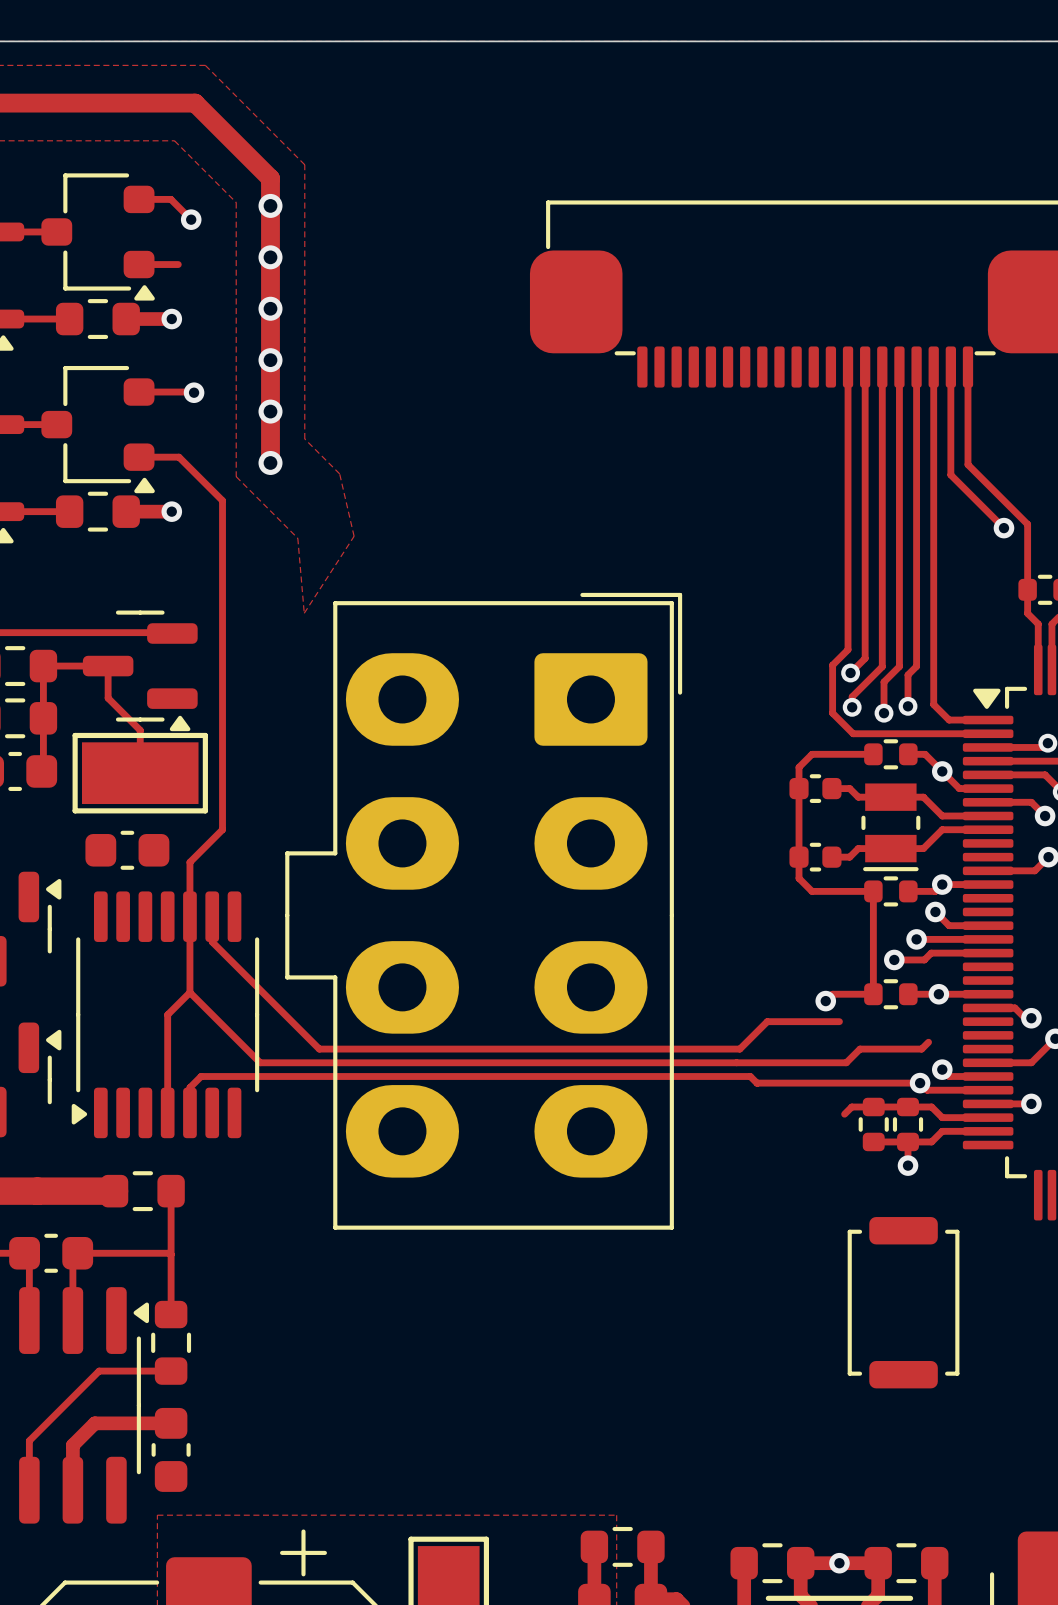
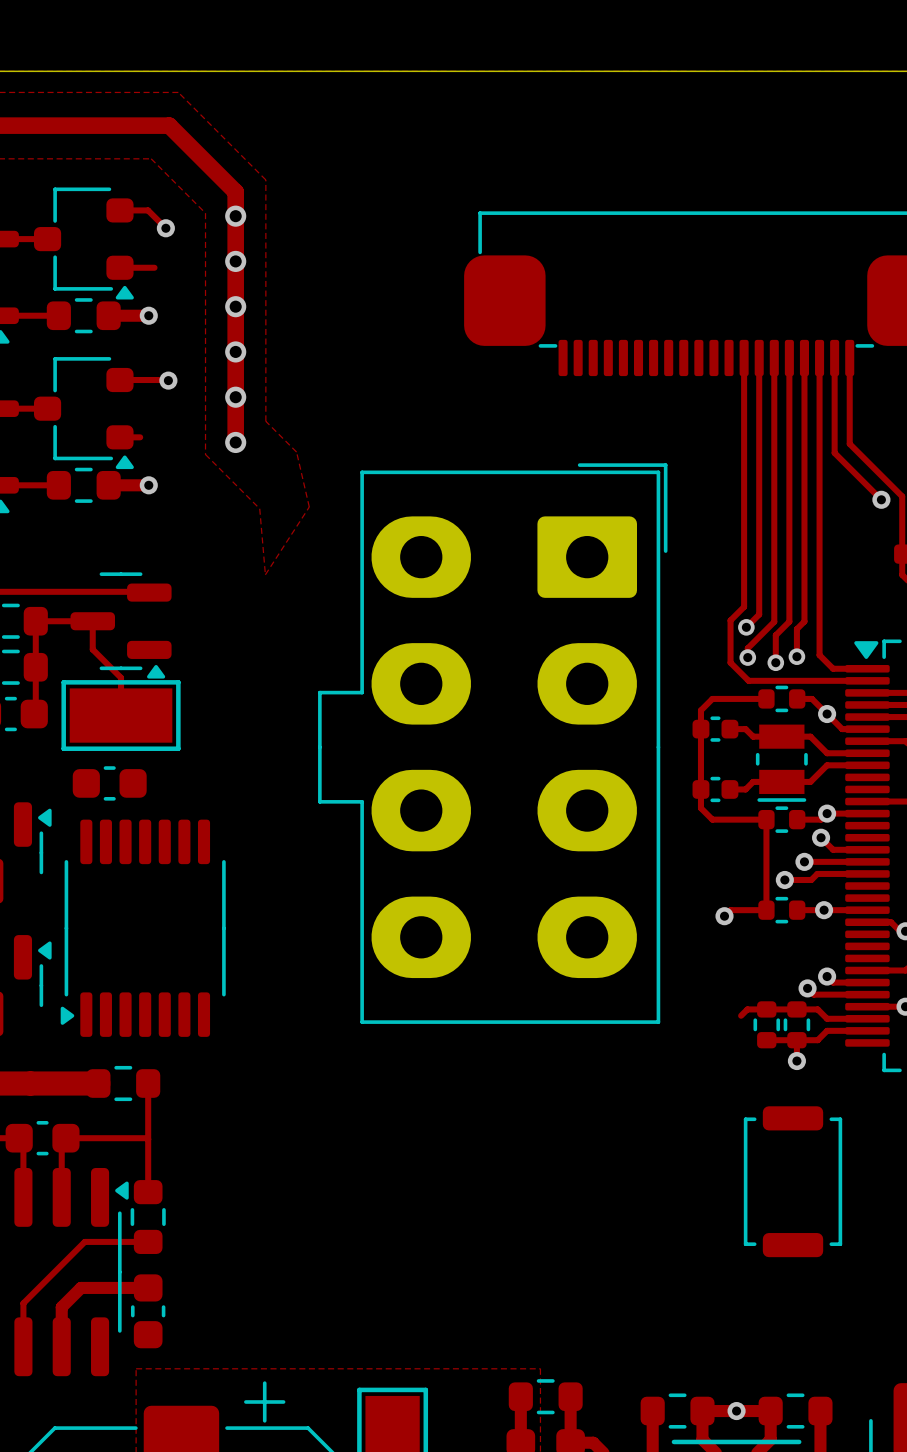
track: (162, 457) (178, 457) (222, 500) (222, 829) (189, 862) (189, 992) -> none
part position: (483, 911) -> (492, 743)
track: (212, 916) (212, 941) (319, 1049) (739, 1049) (767, 1021) (839, 1021) -> none
track: (189, 992) (260, 1062) (846, 1062) (860, 1049) (921, 1049) (928, 1042) -> none
track: (189, 992) (167, 1014) (167, 1112) -> none
track: (757, 1083) (920, 1083) -> none
track: (757, 1083) (750, 1076) (201, 1076) (189, 1087) (189, 1112) -> none

